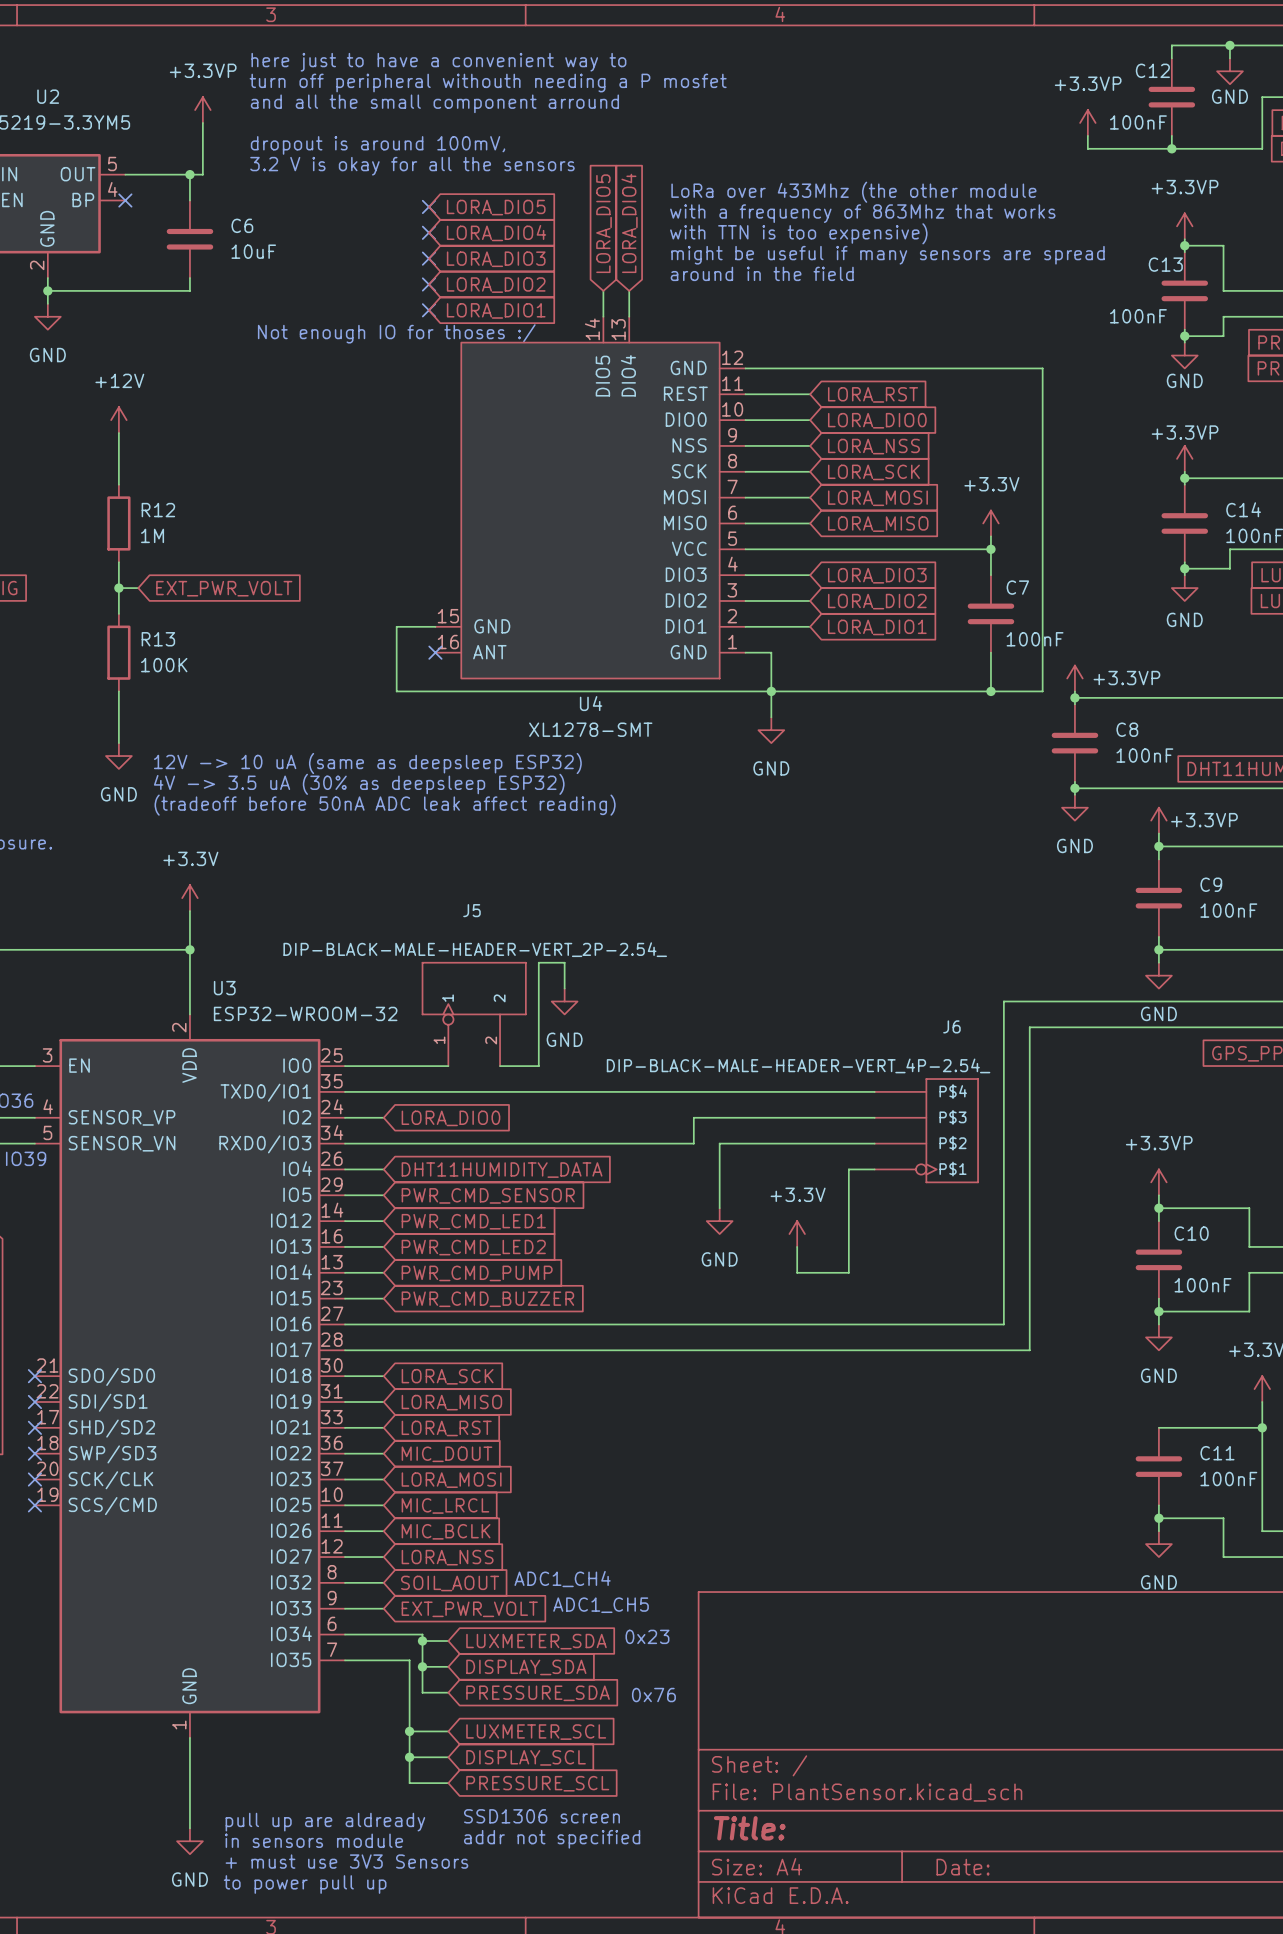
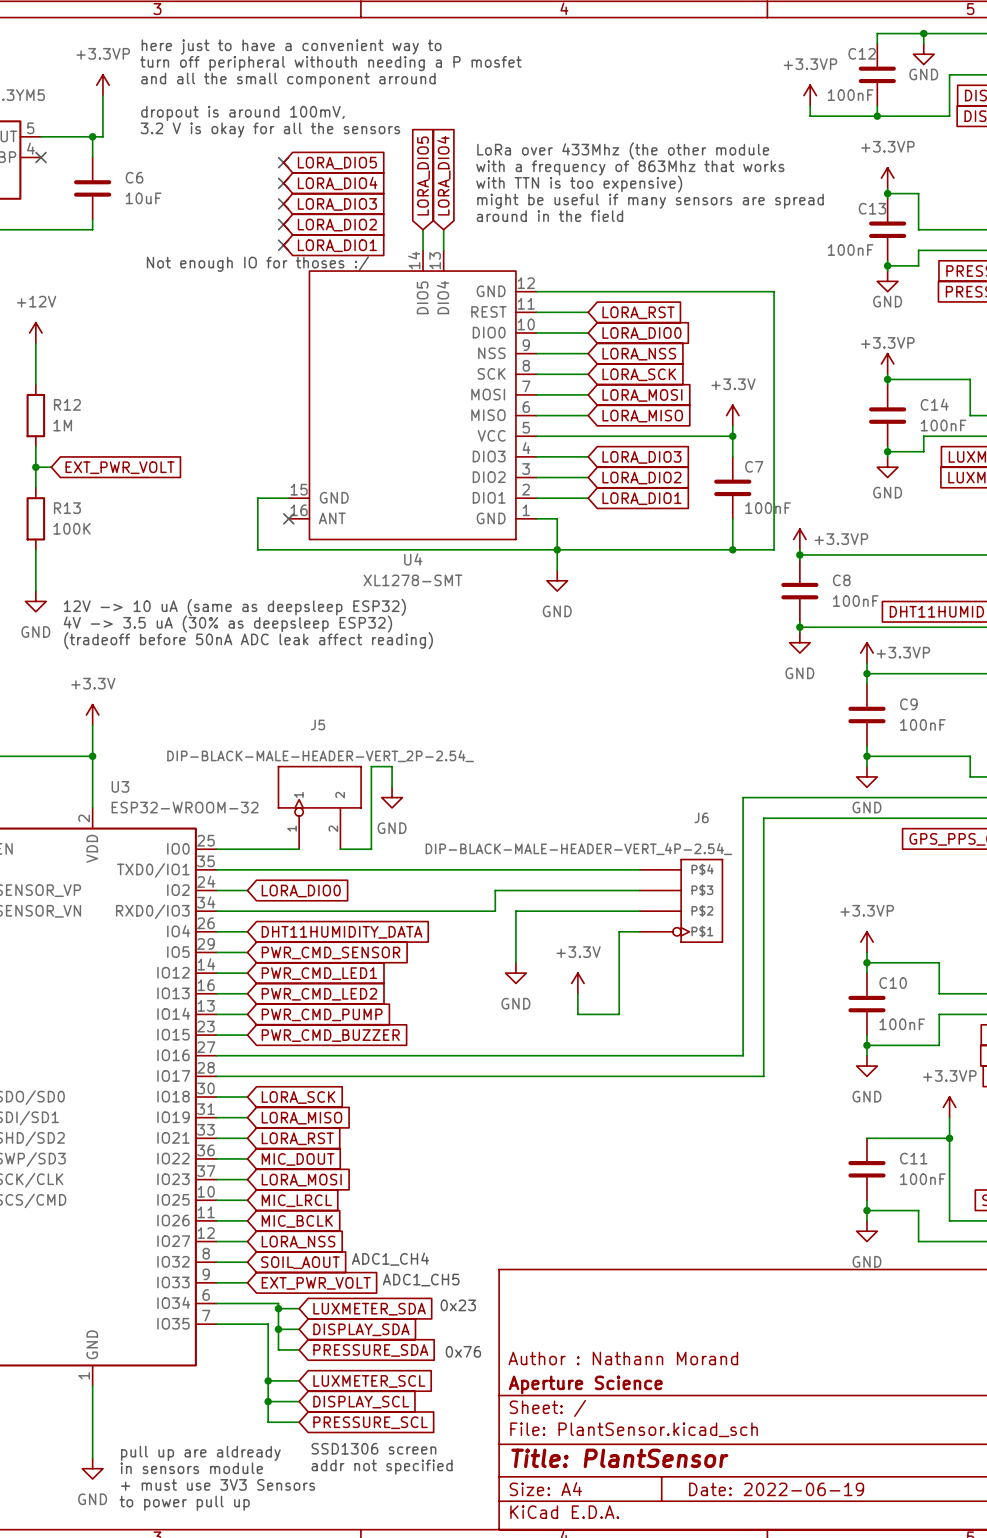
title block: none -> Author : Nathann Morand (623, 1358)
title block: none -> Aperture Science (585, 1384)
title block: Title: (749, 1828) -> Title: PlantSensor (619, 1458)
title block: Date: (963, 1867) -> Date: 2022-06-19 (776, 1489)

